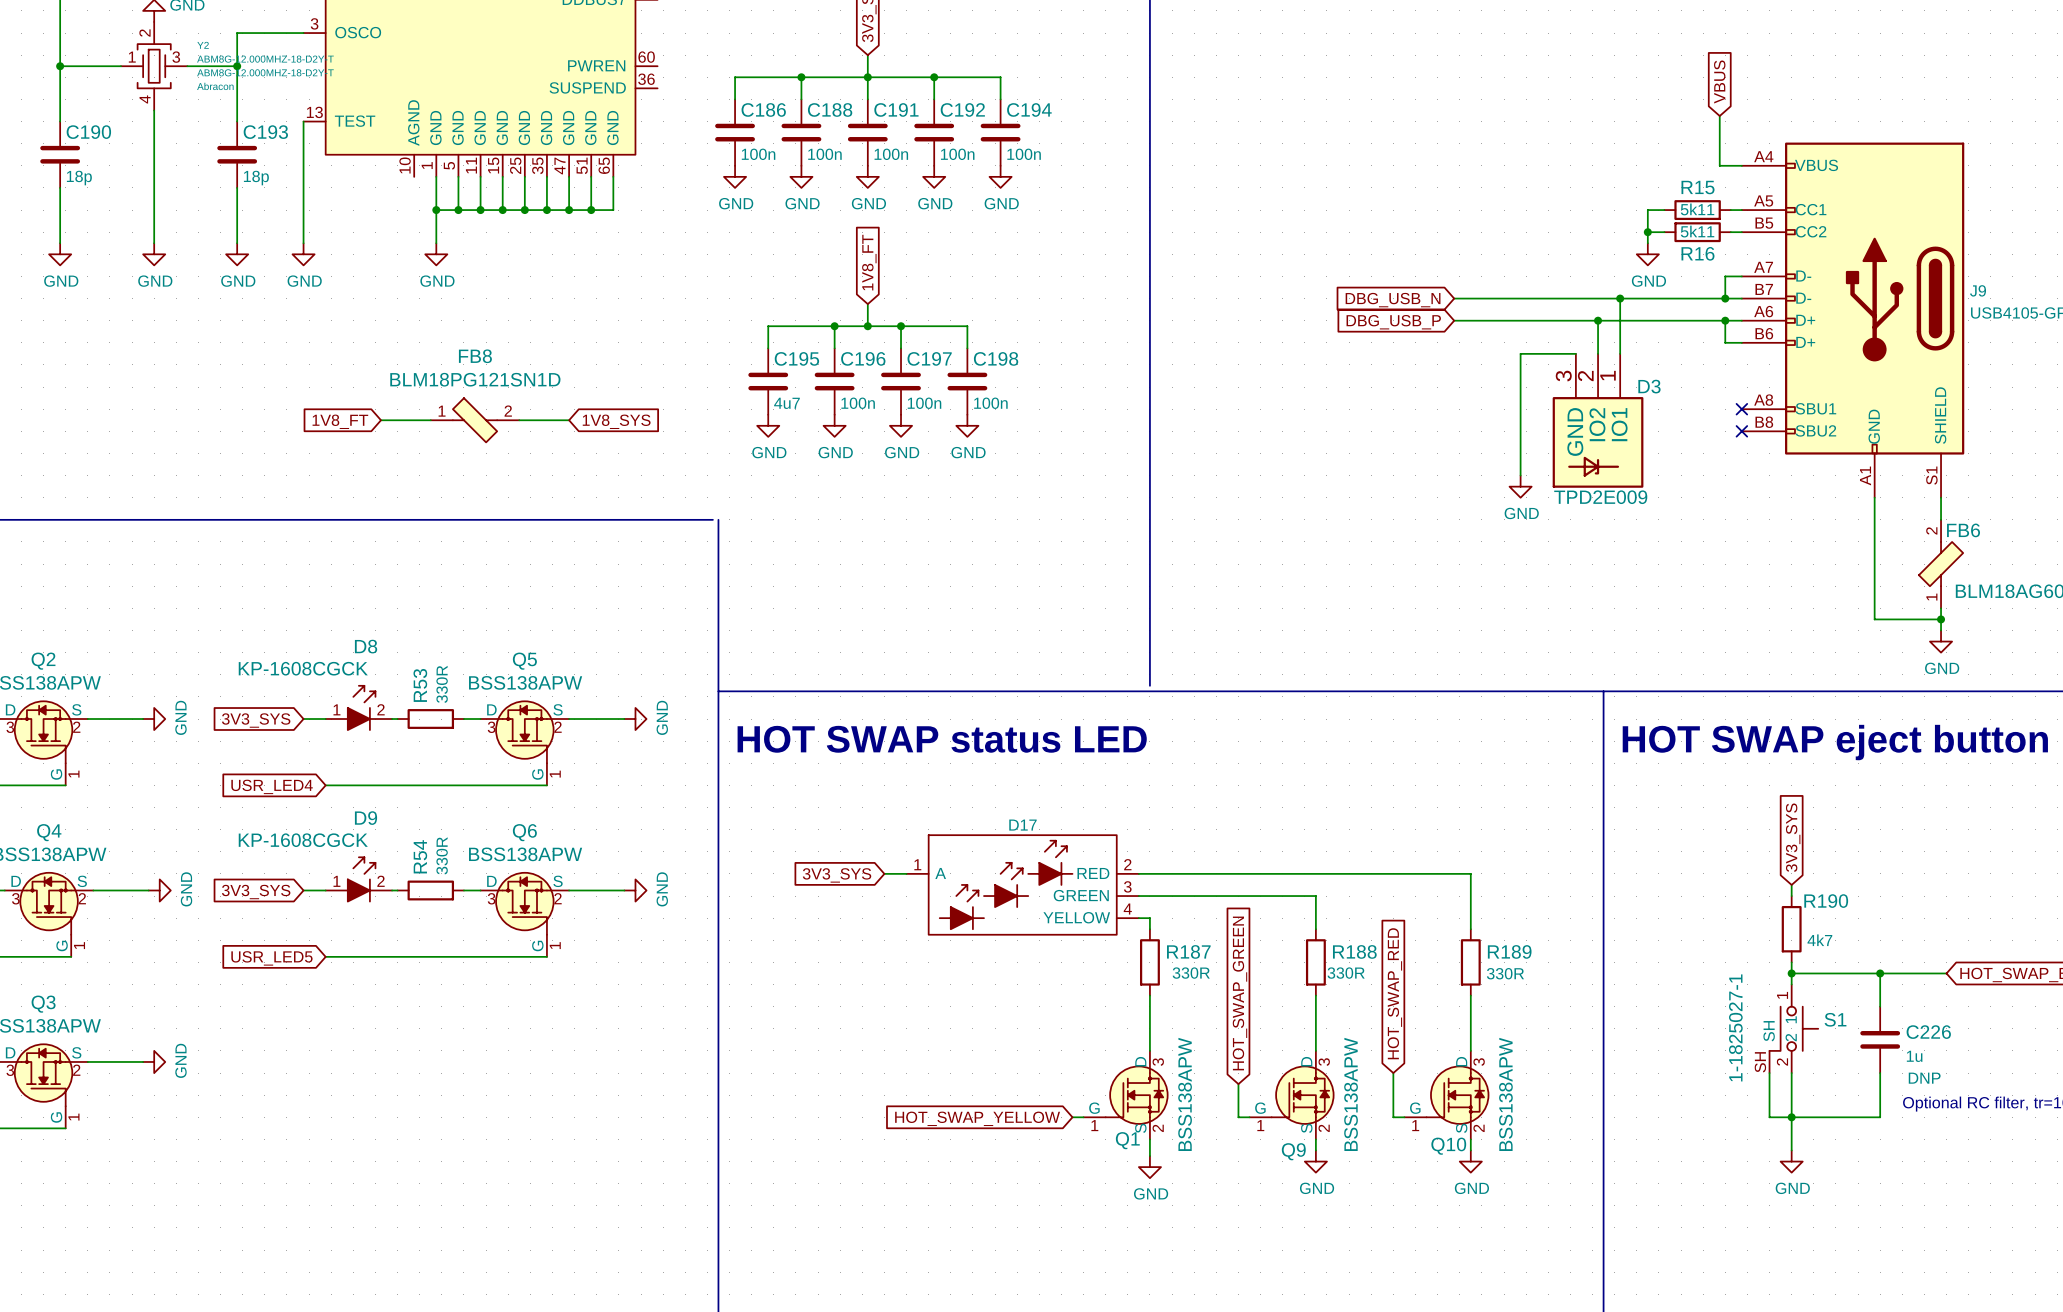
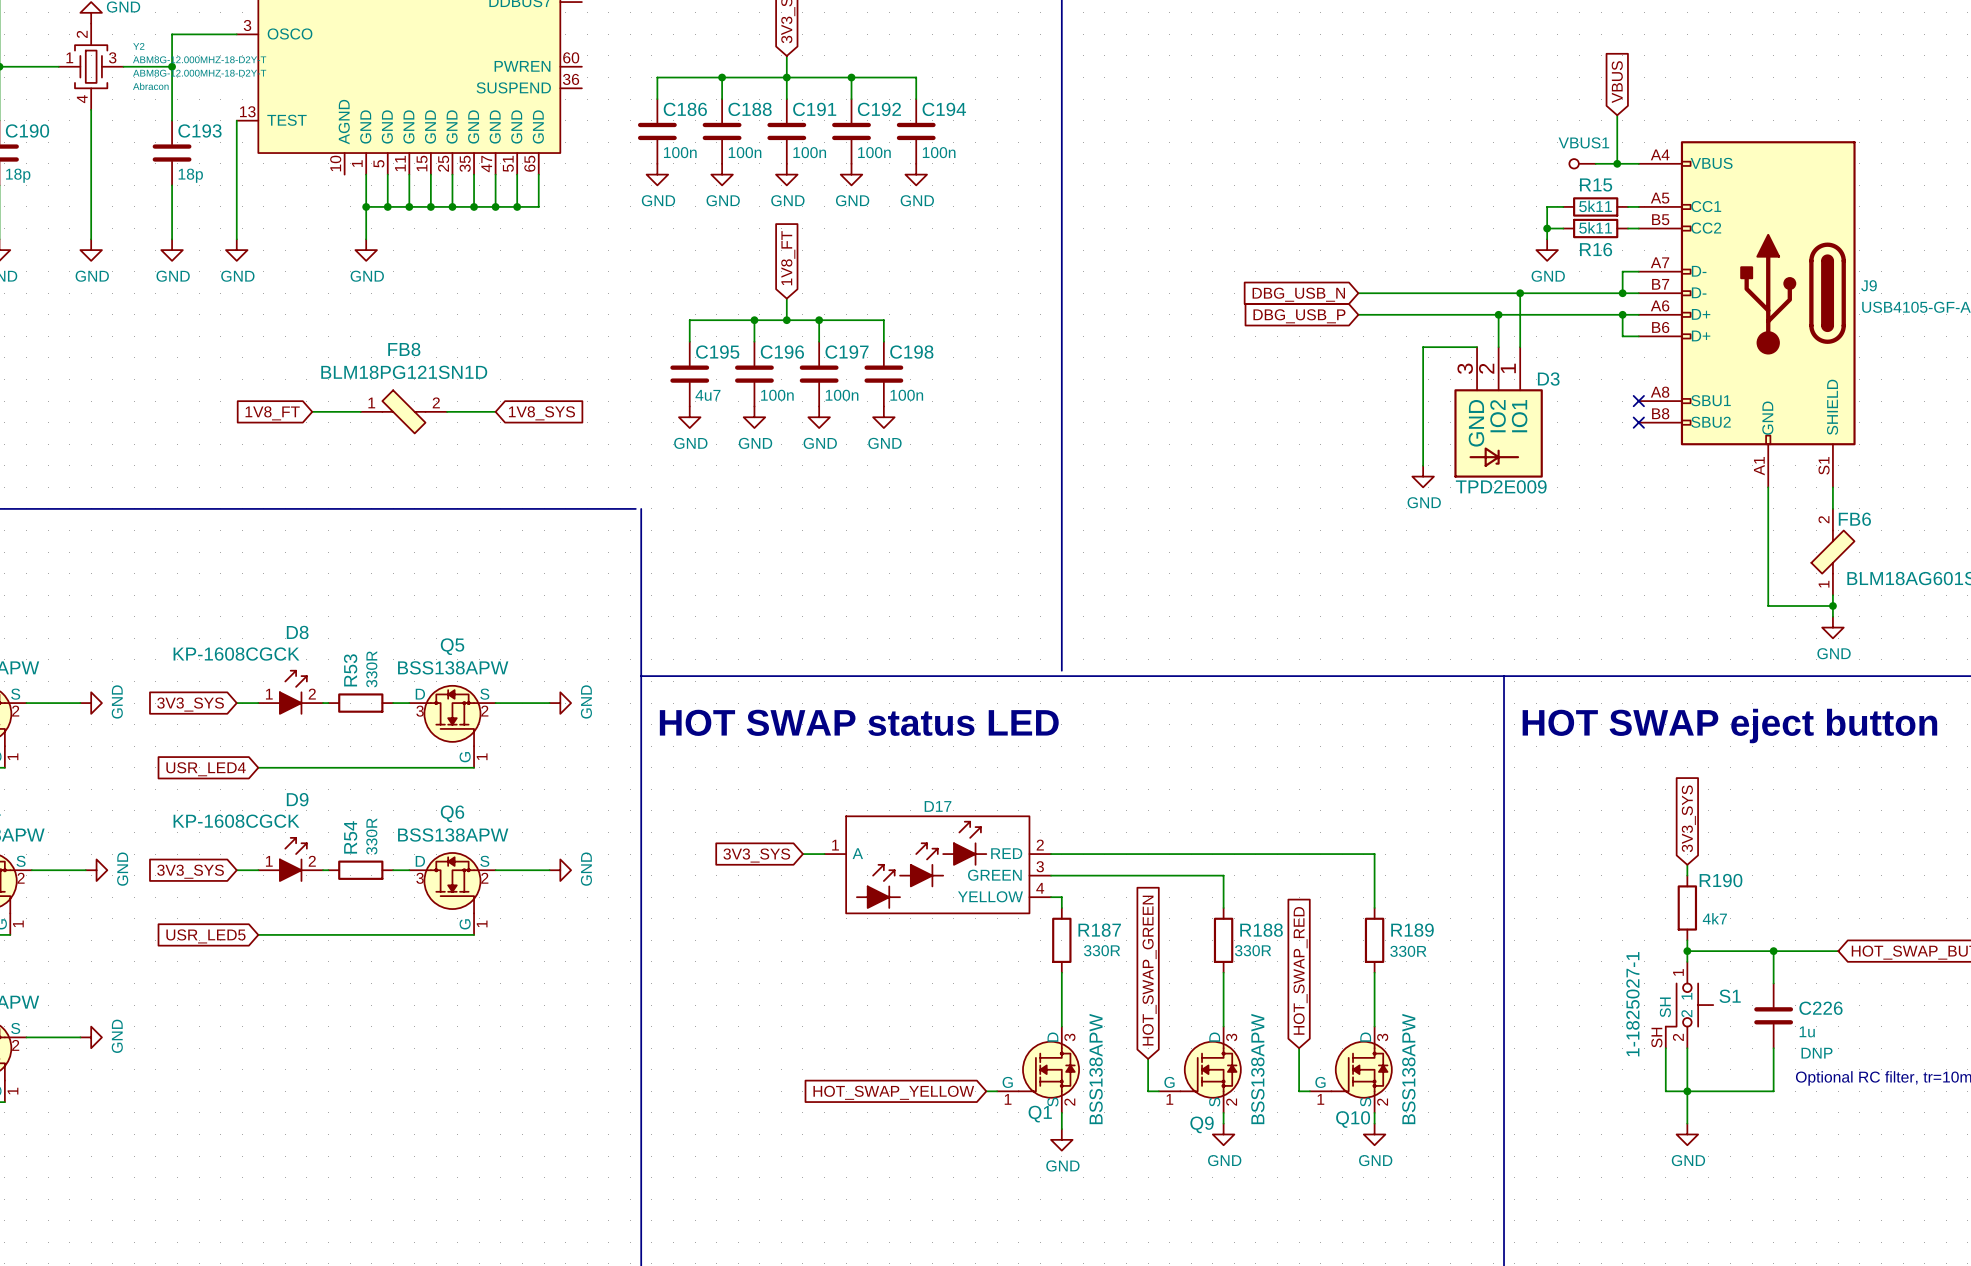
VBUS1: none -> (1582, 163)
wire: none -> (1595, 163) (1617, 163)
junction: none -> (1617, 163)

